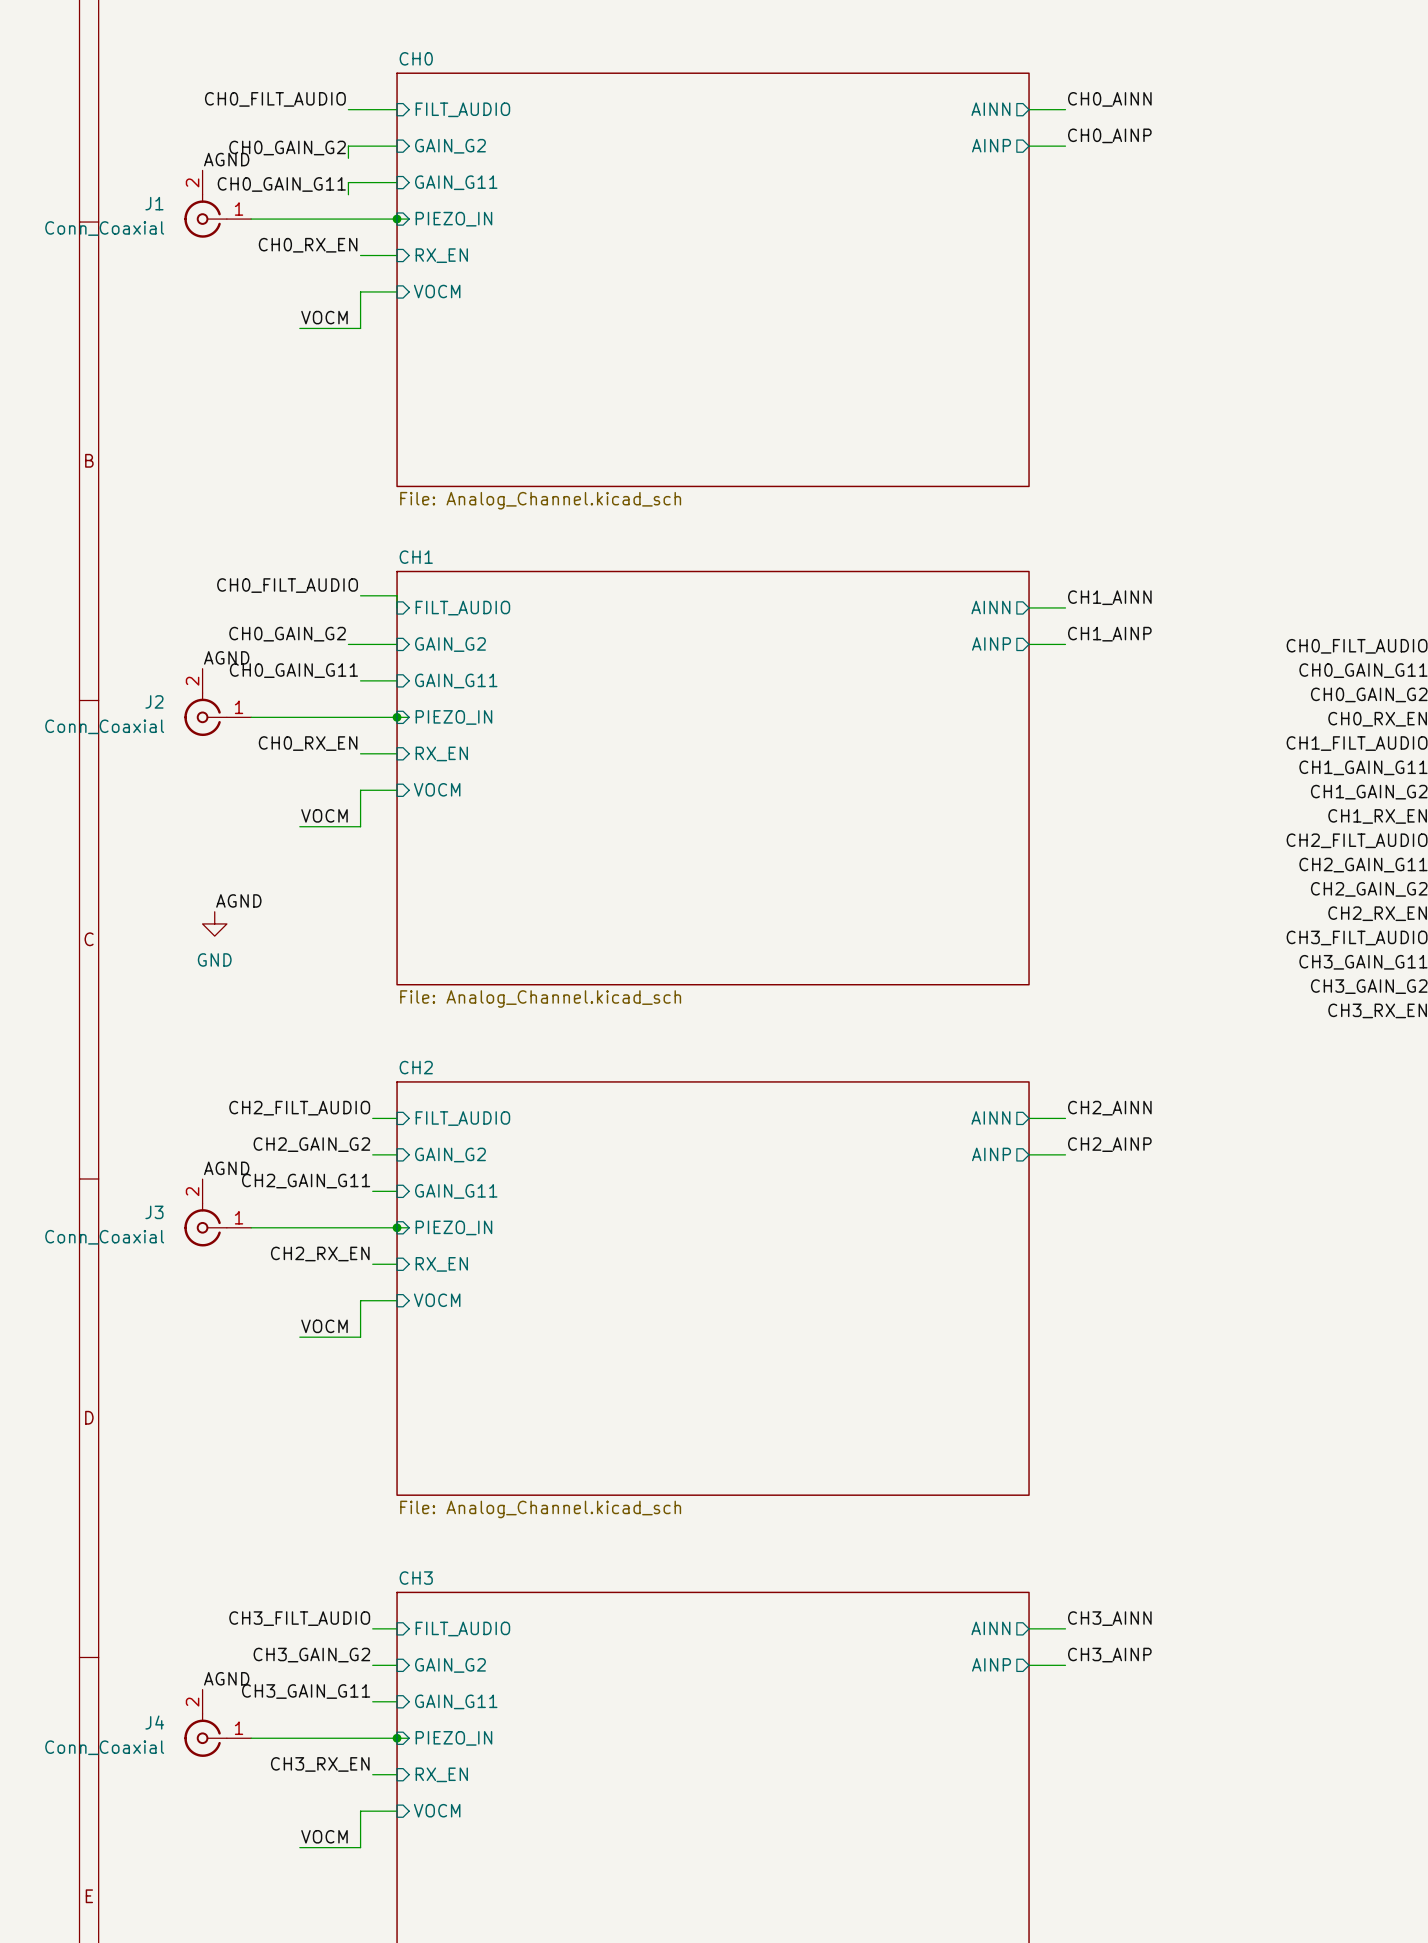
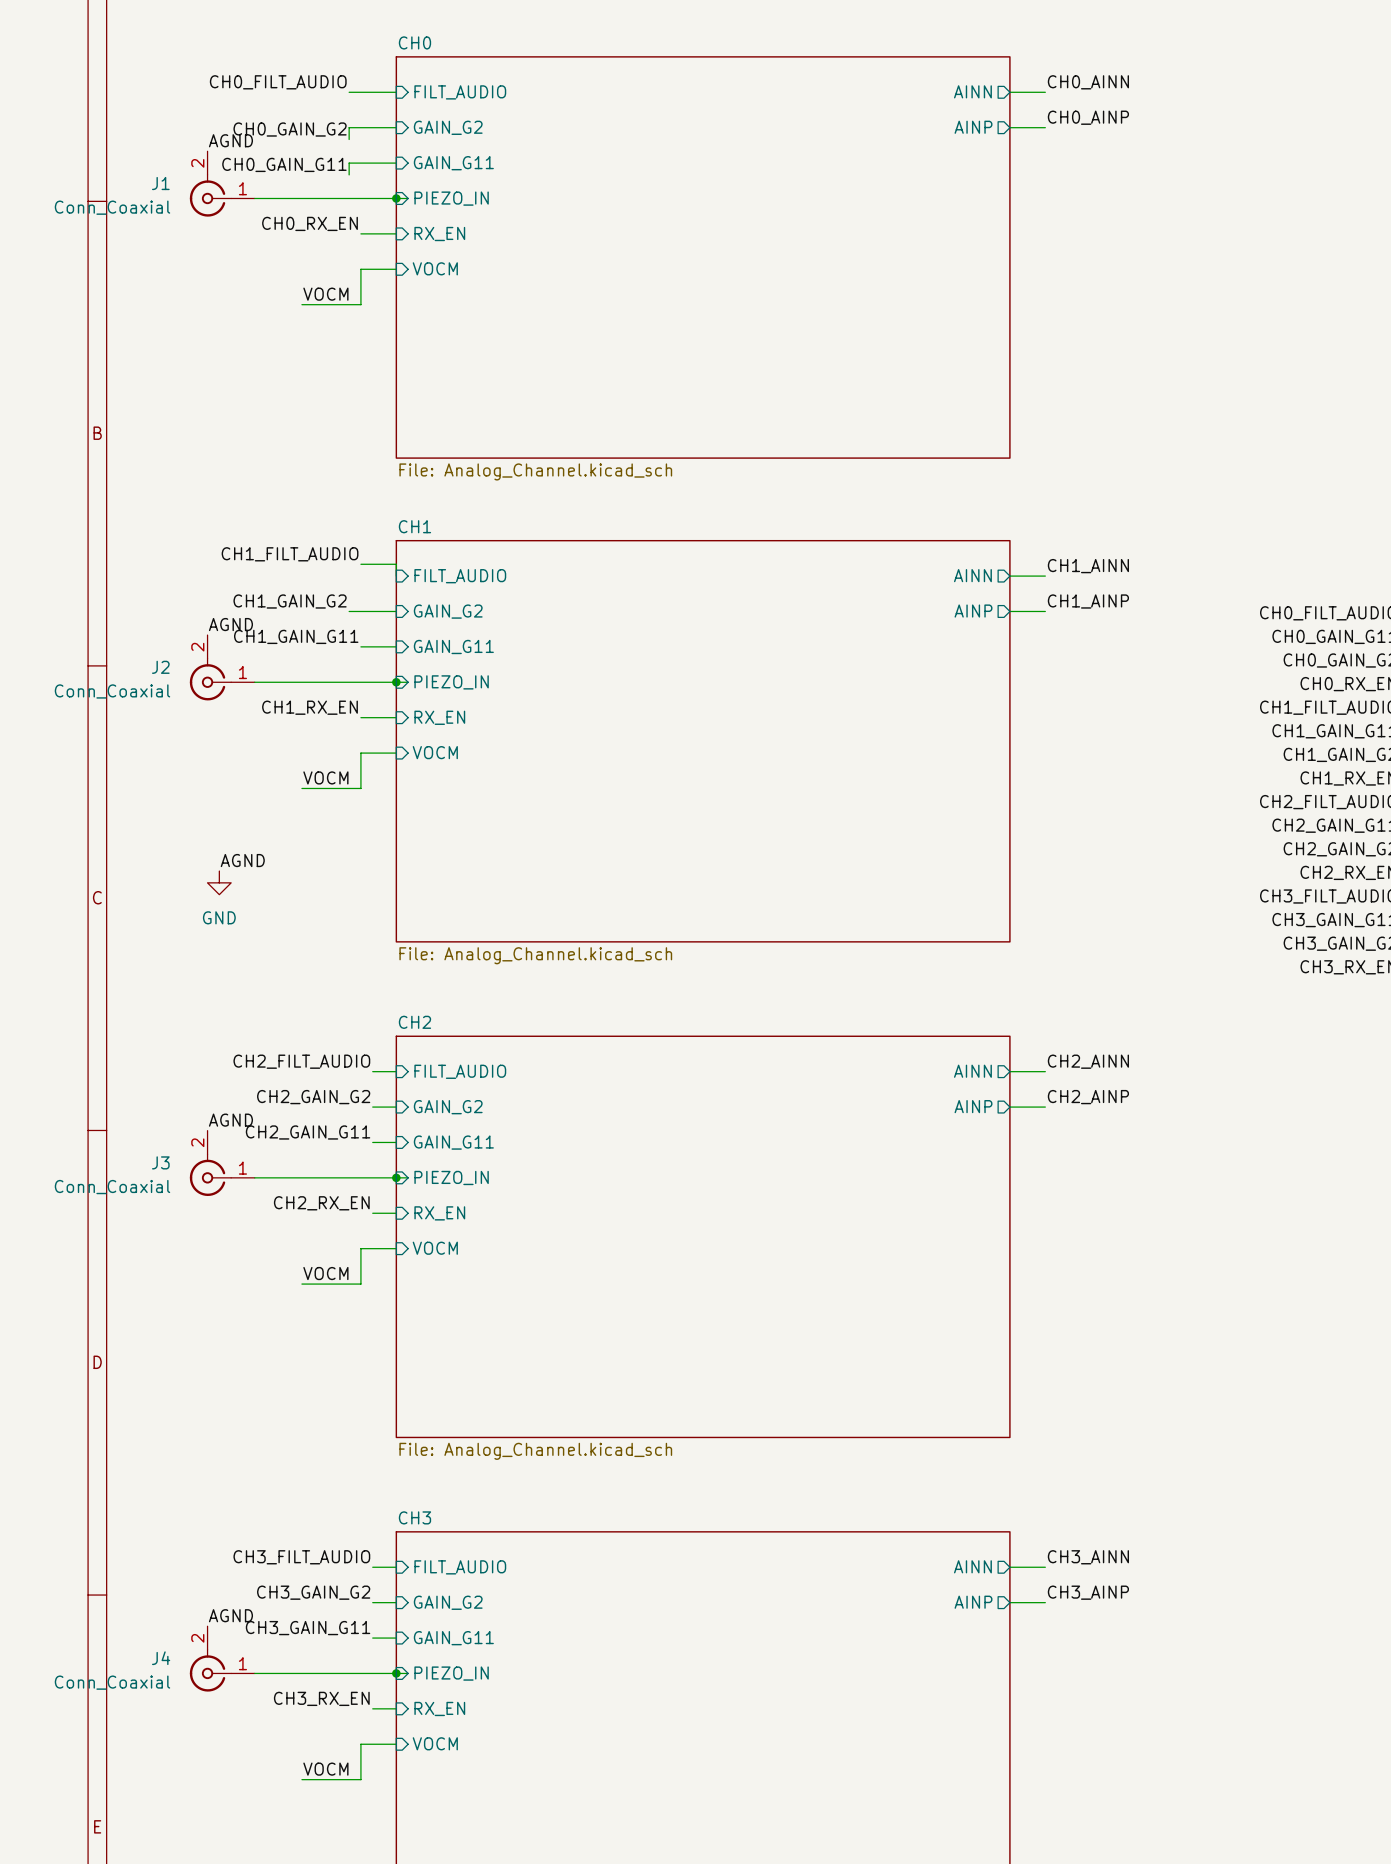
label: CH0_FILT_AUDIO (287, 585) -> CH1_FILT_AUDIO (290, 554)
label: CH0_GAIN_G2 (287, 634) -> CH1_GAIN_G2 (290, 601)
label: CH0_GAIN_G11 (293, 670) -> CH1_GAIN_G11 (296, 636)
label: CH0_RX_EN (308, 743) -> CH1_RX_EN (310, 707)

